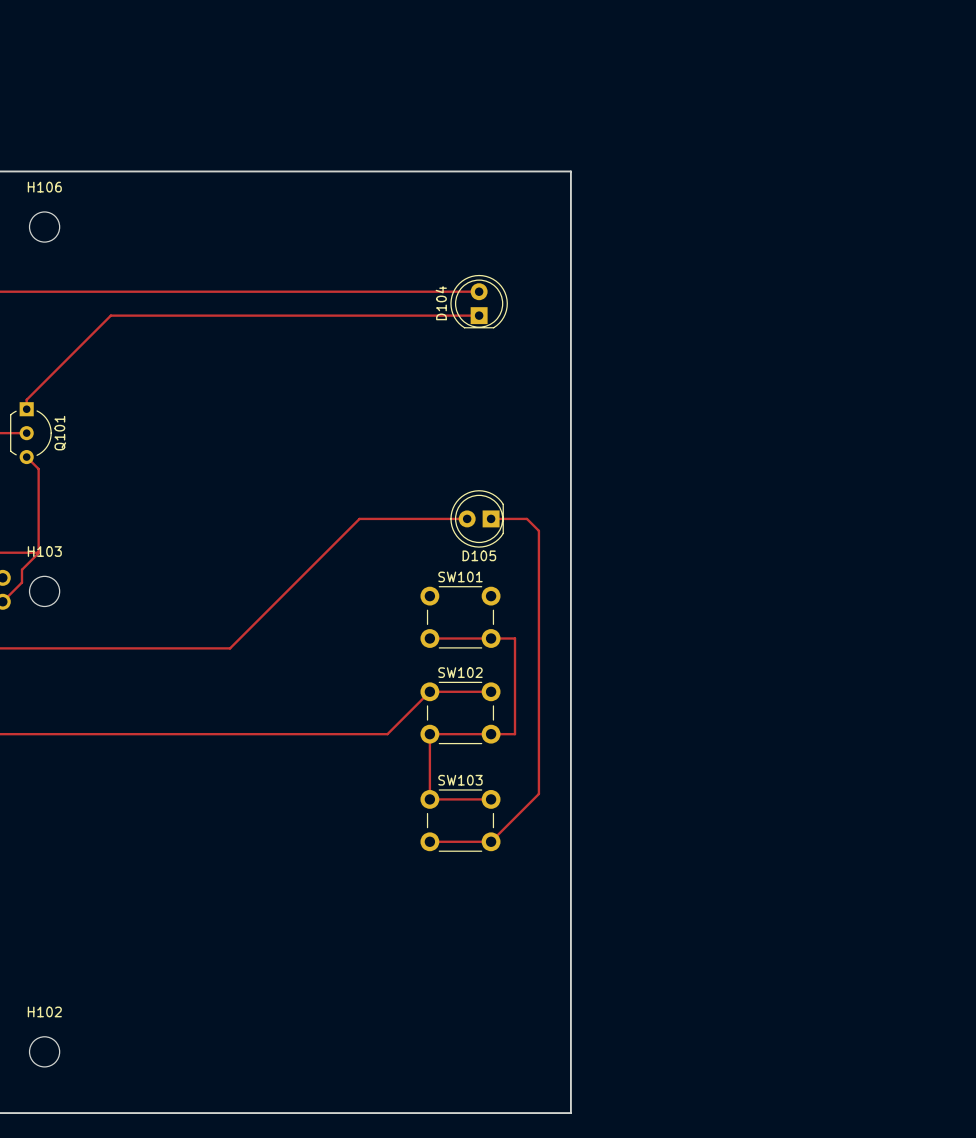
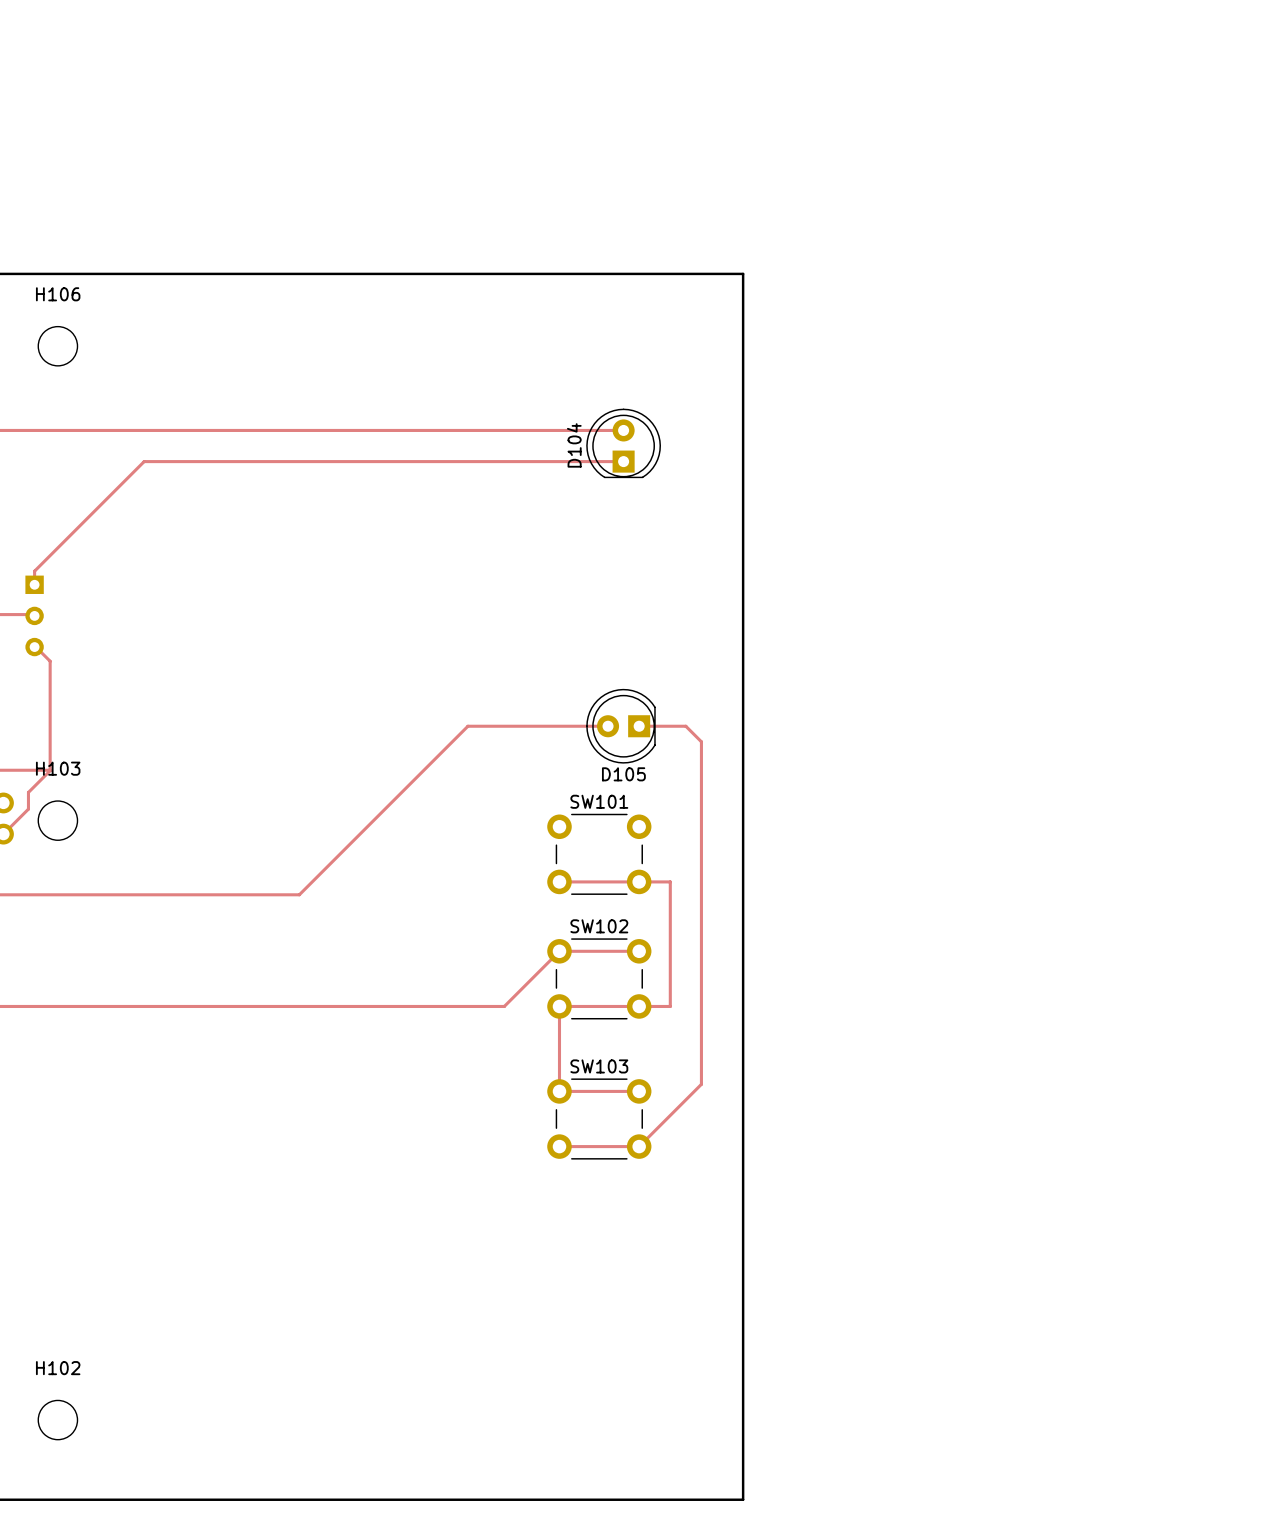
Q101 side: top (30, 433) -> bottom (34, 615)

